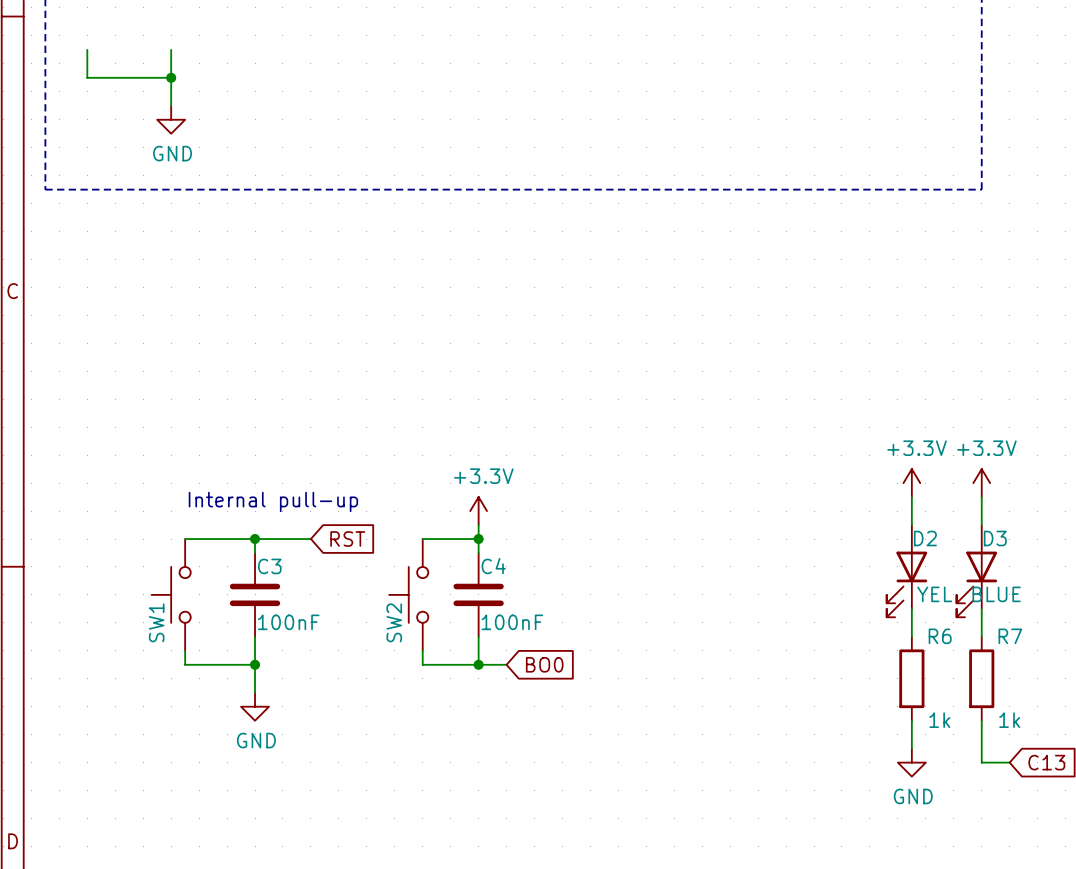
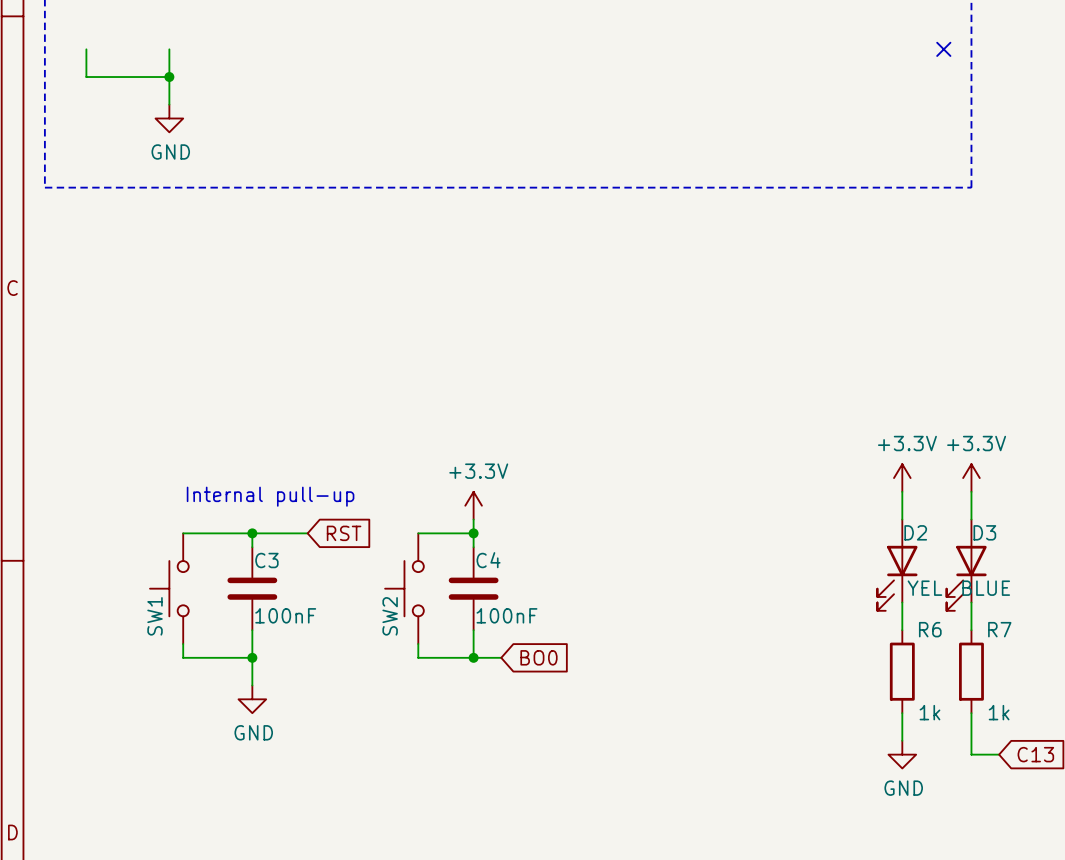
no-connect mark: none -> (943, 49)

